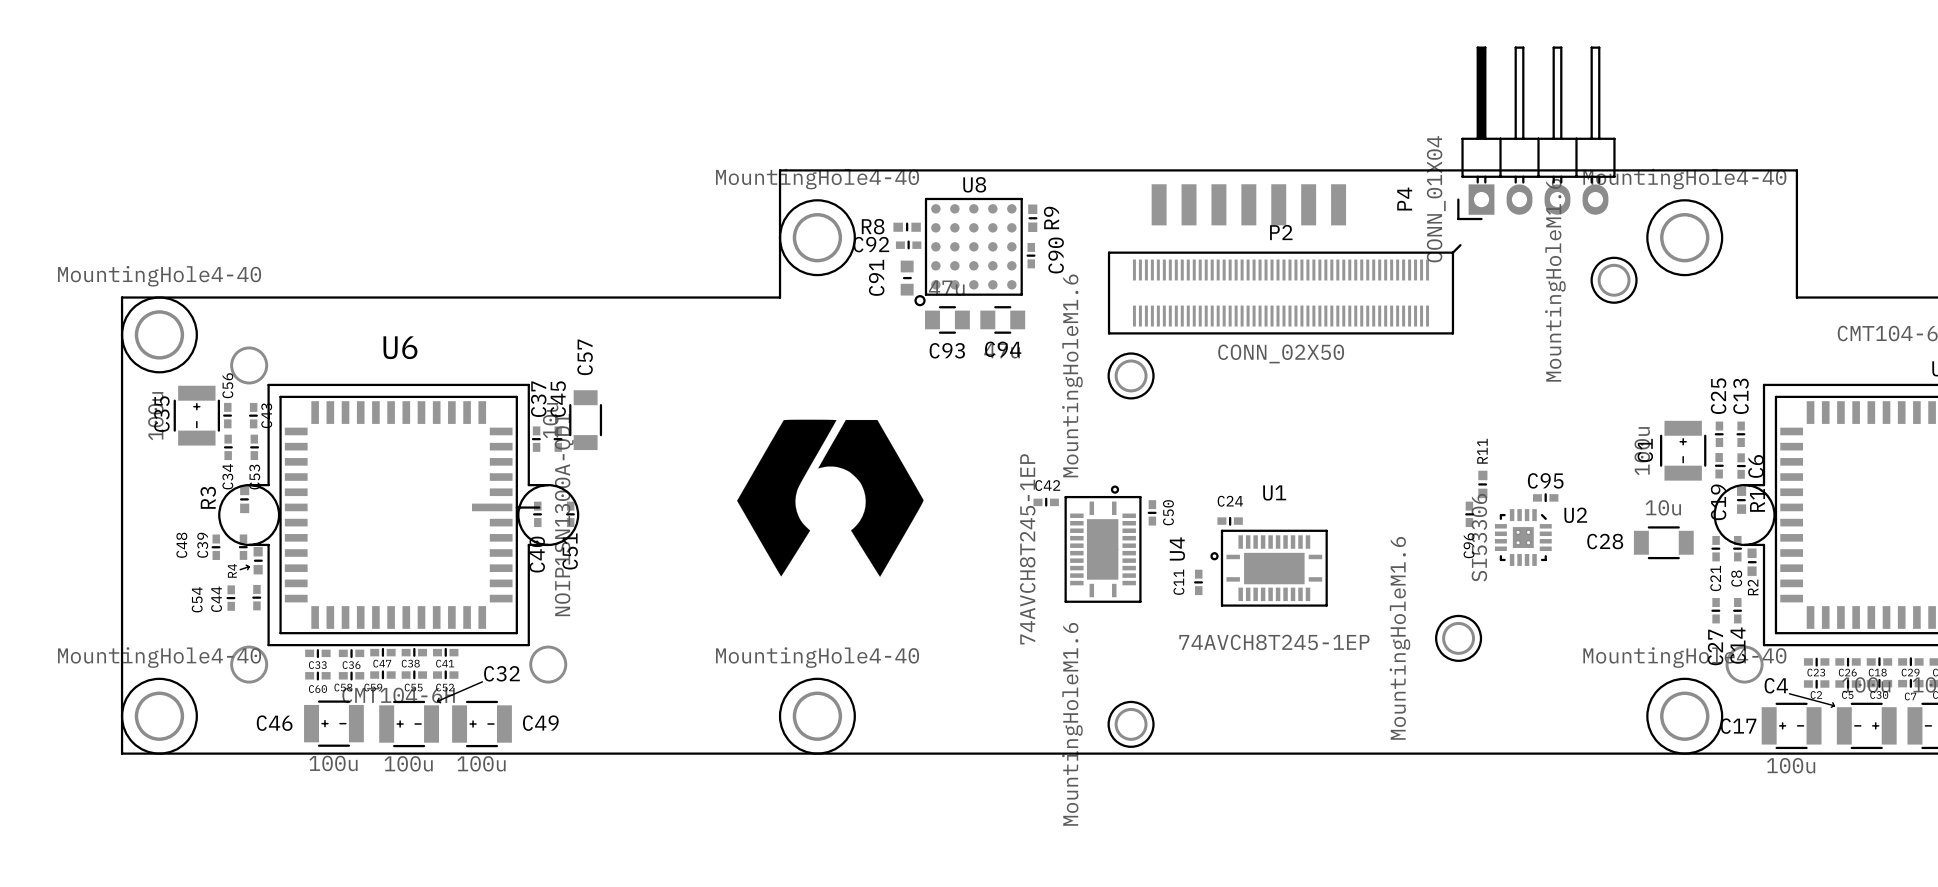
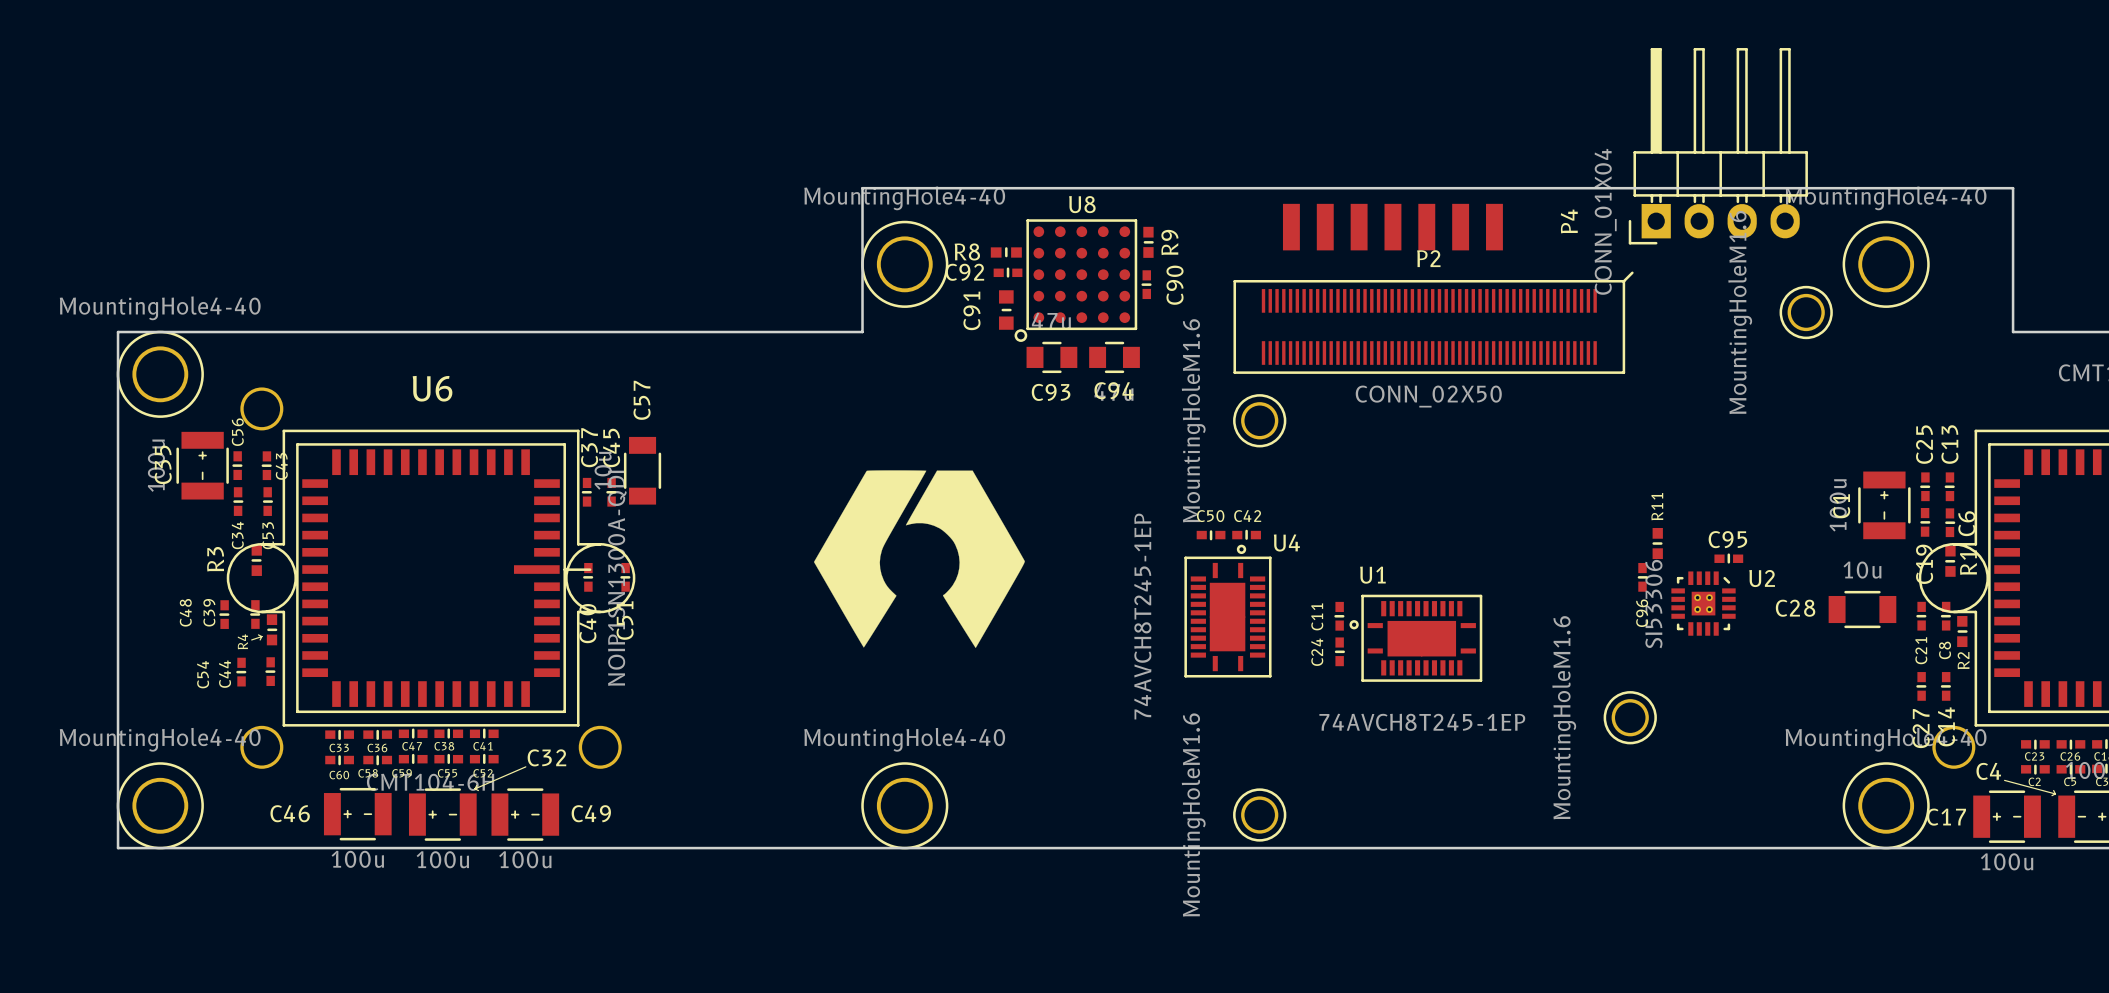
U1 name position: U1 (1274, 492) -> U1 (1372, 575)
C42 position: (1046, 502) -> (1246, 534)
C50 rotation: 0° (1152, 512) -> 90° counterclockwise (1211, 535)
C50 position: (1152, 512) -> (1211, 535)
C24 rotation: 0° (1230, 521) -> 90° counterclockwise (1339, 651)
C24 position: (1230, 521) -> (1339, 651)
U4 name rotation: 0° (1177, 548) -> 90° clockwise (1286, 542)
U4 name position: U4 (1177, 548) -> U4 (1286, 542)
C11 position: (1198, 582) -> (1339, 616)

